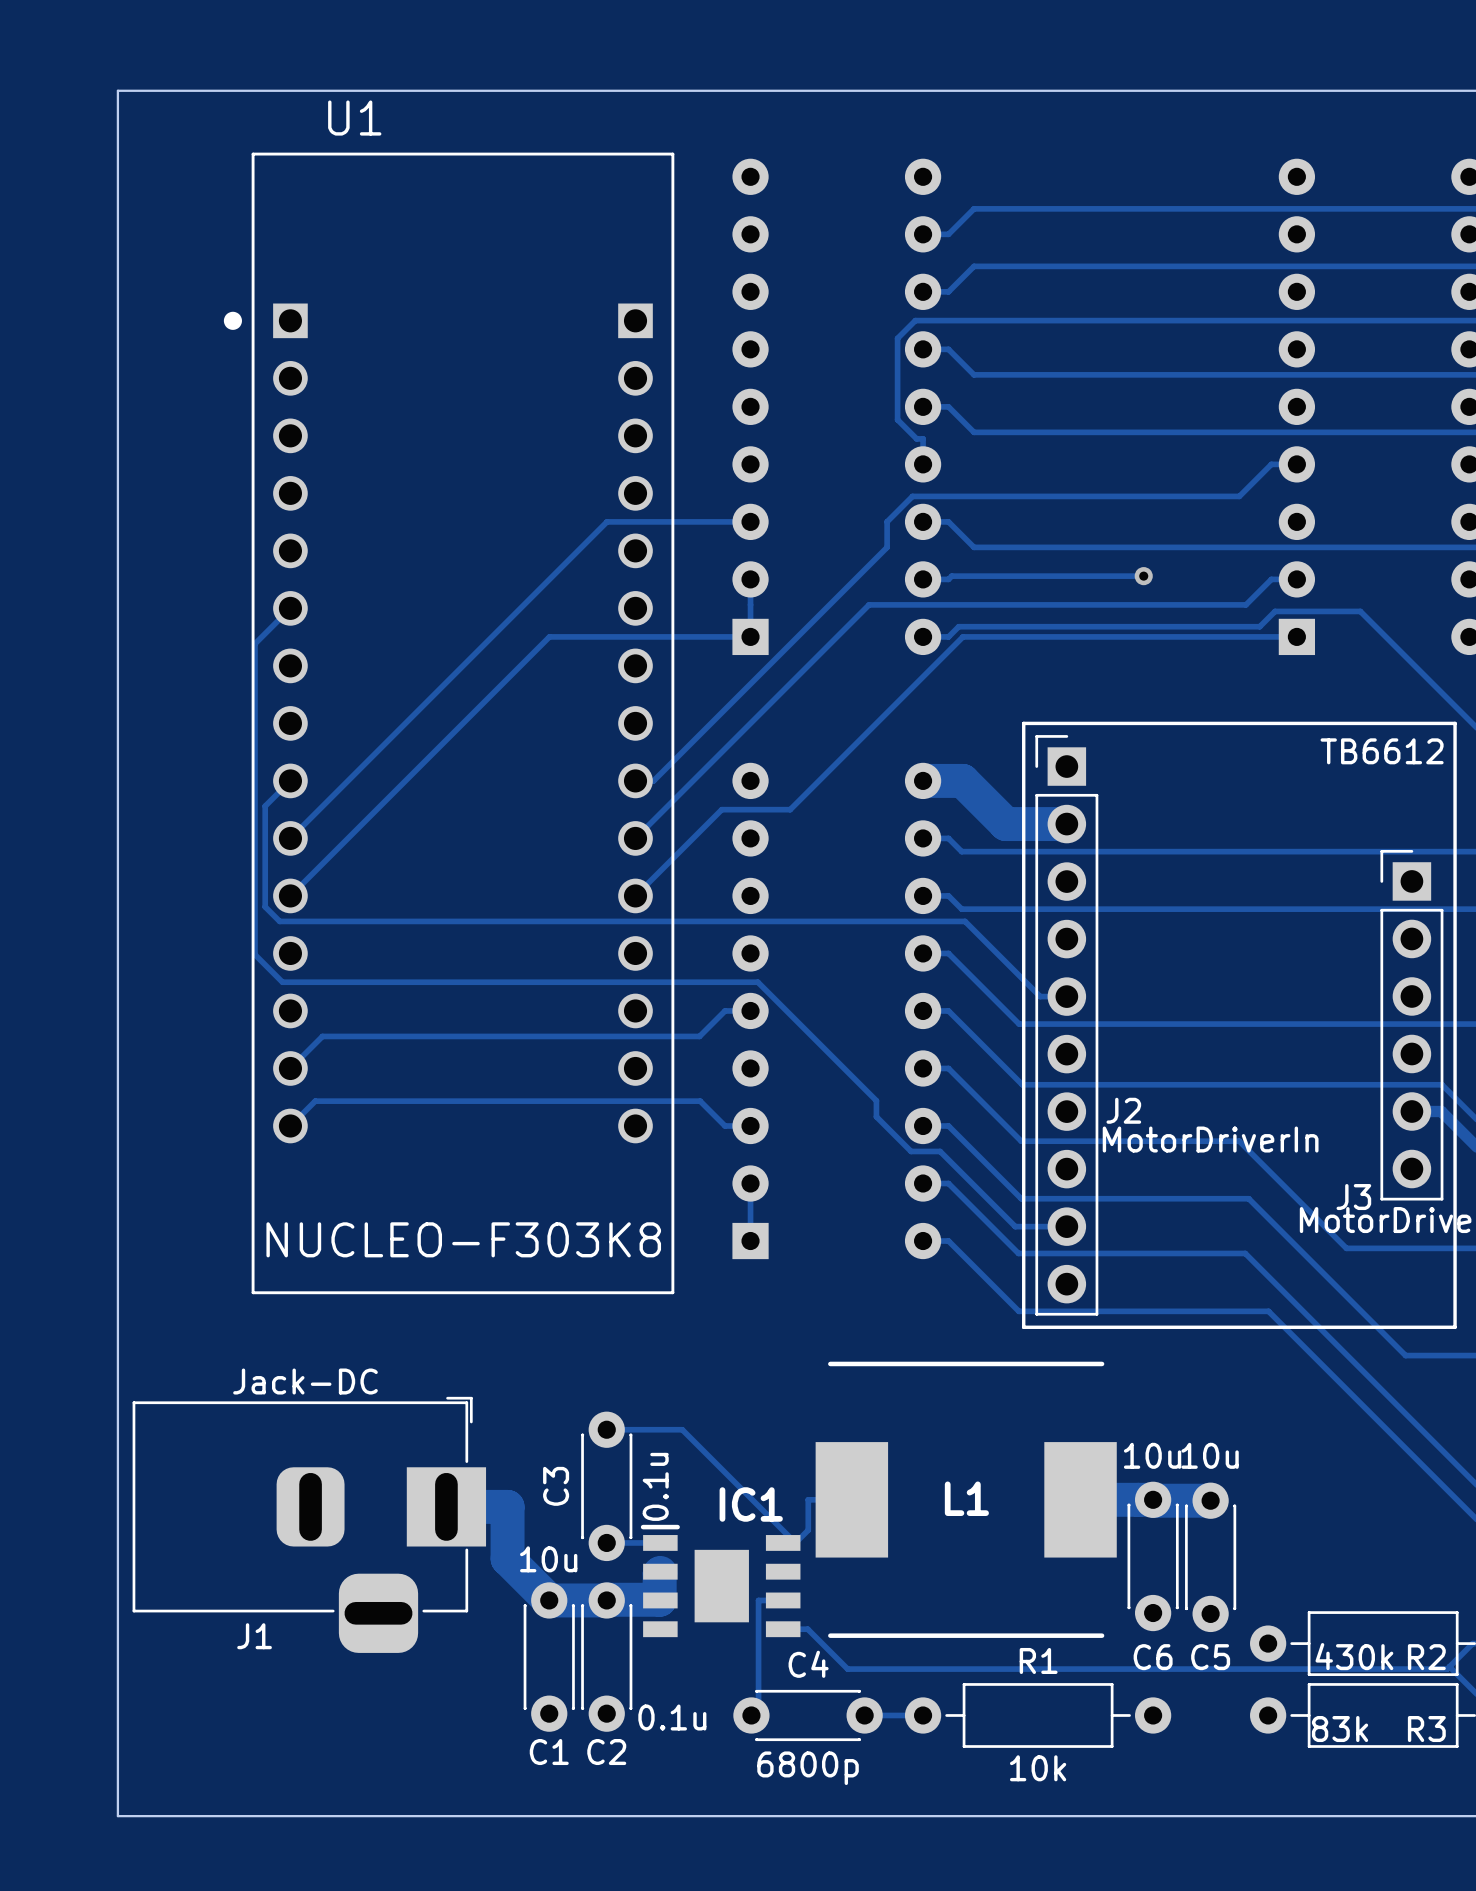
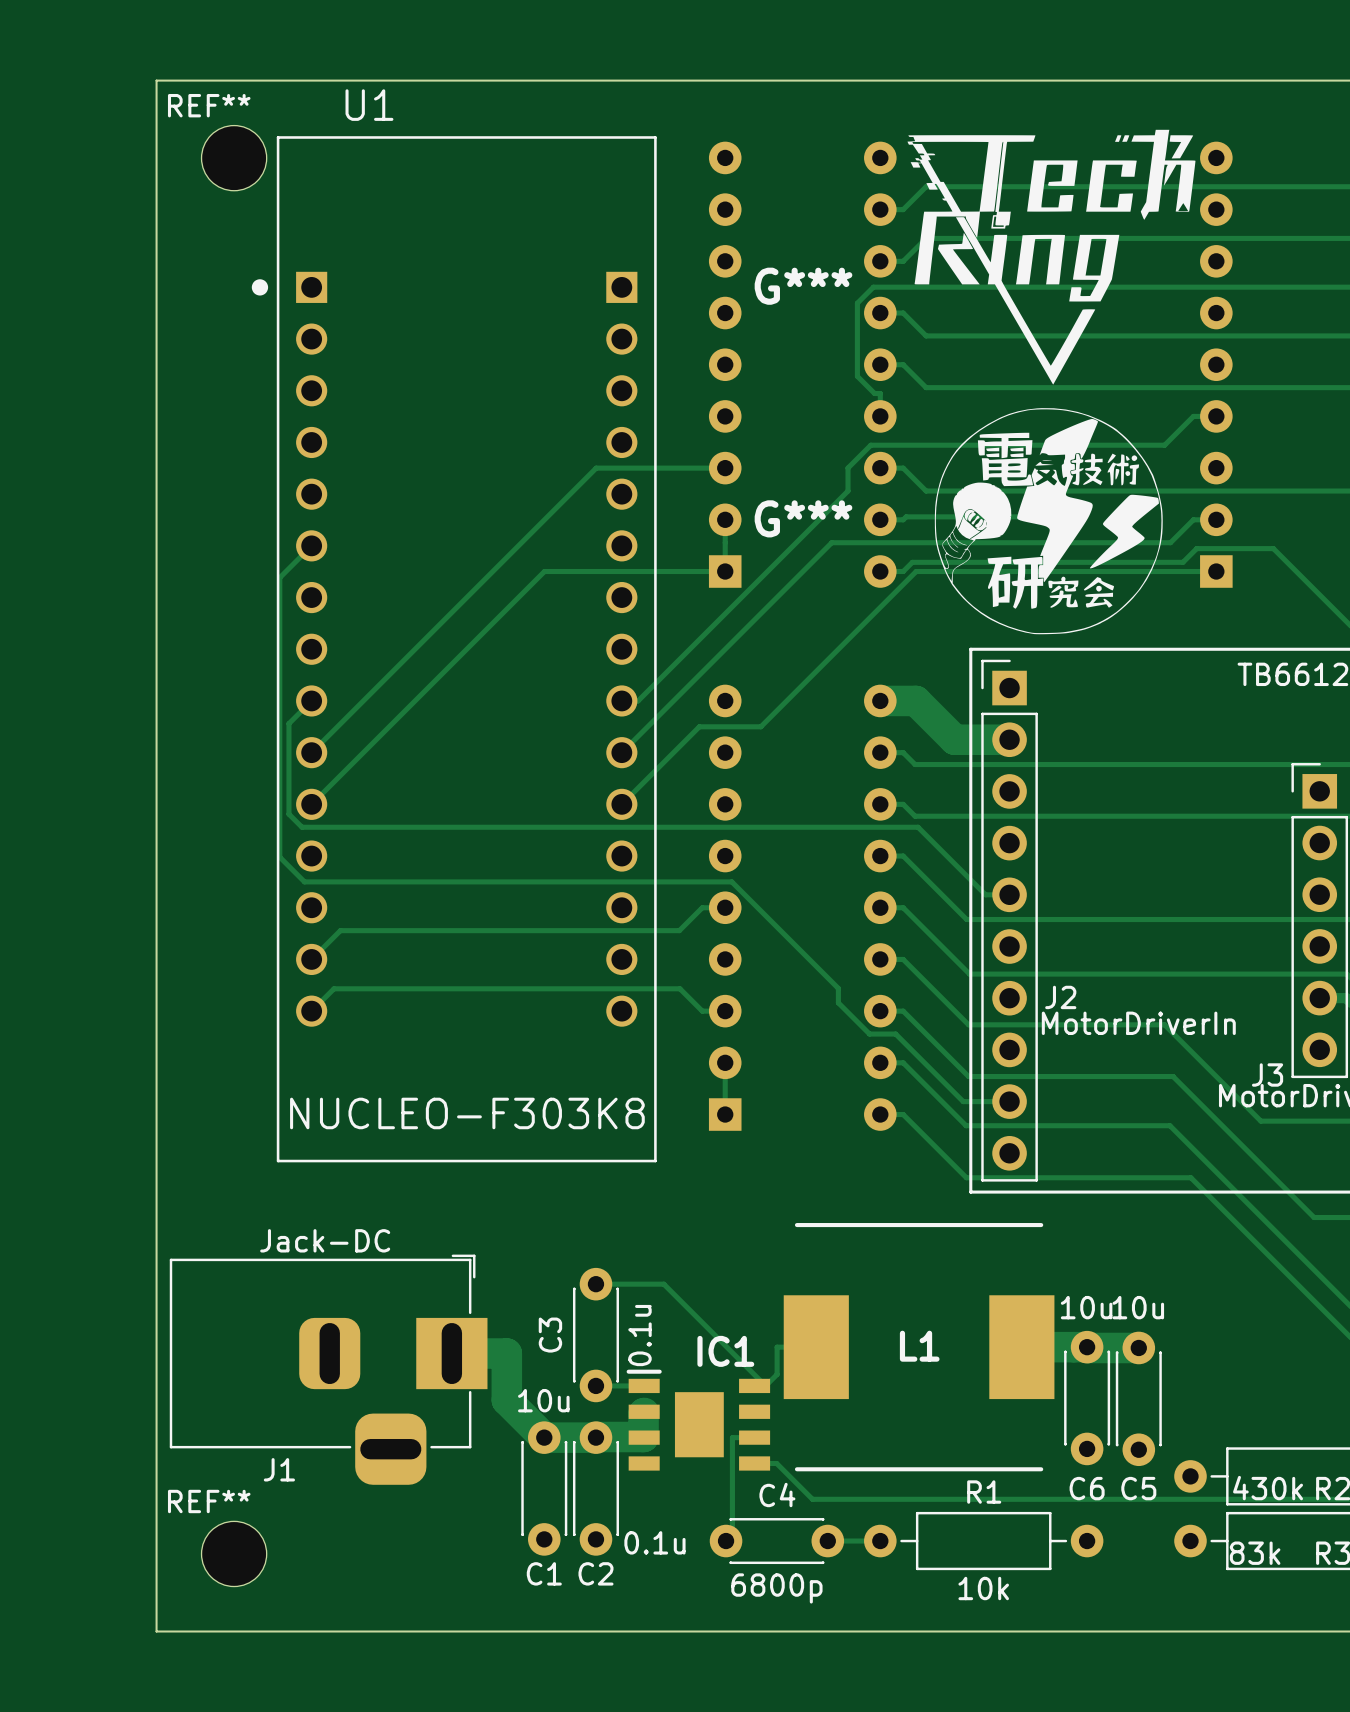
REF**: none -> (234, 158)
G***: none -> (1051, 257)
G***: none -> (1048, 521)
REF**: none -> (234, 1553)

